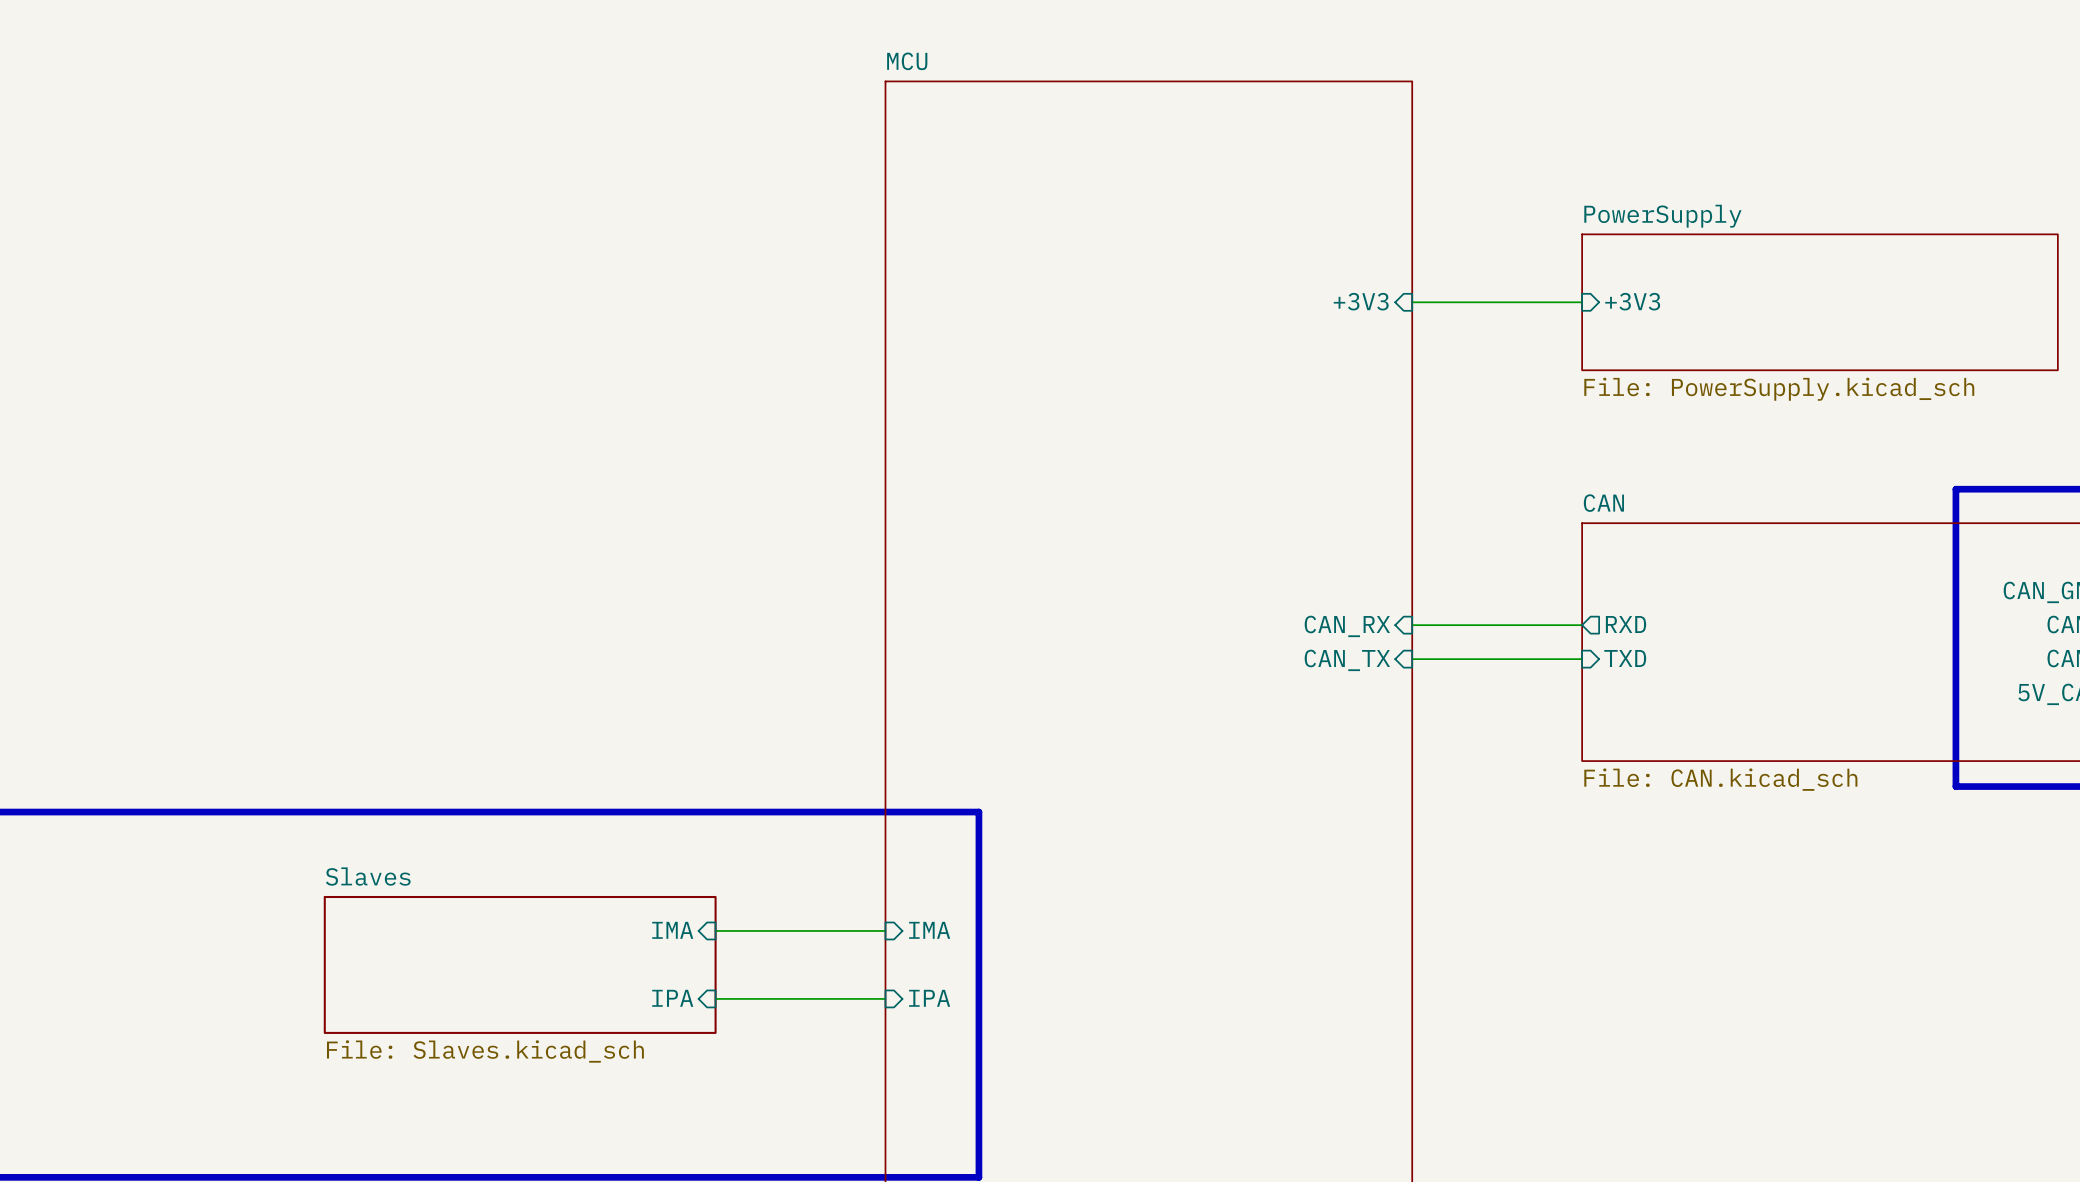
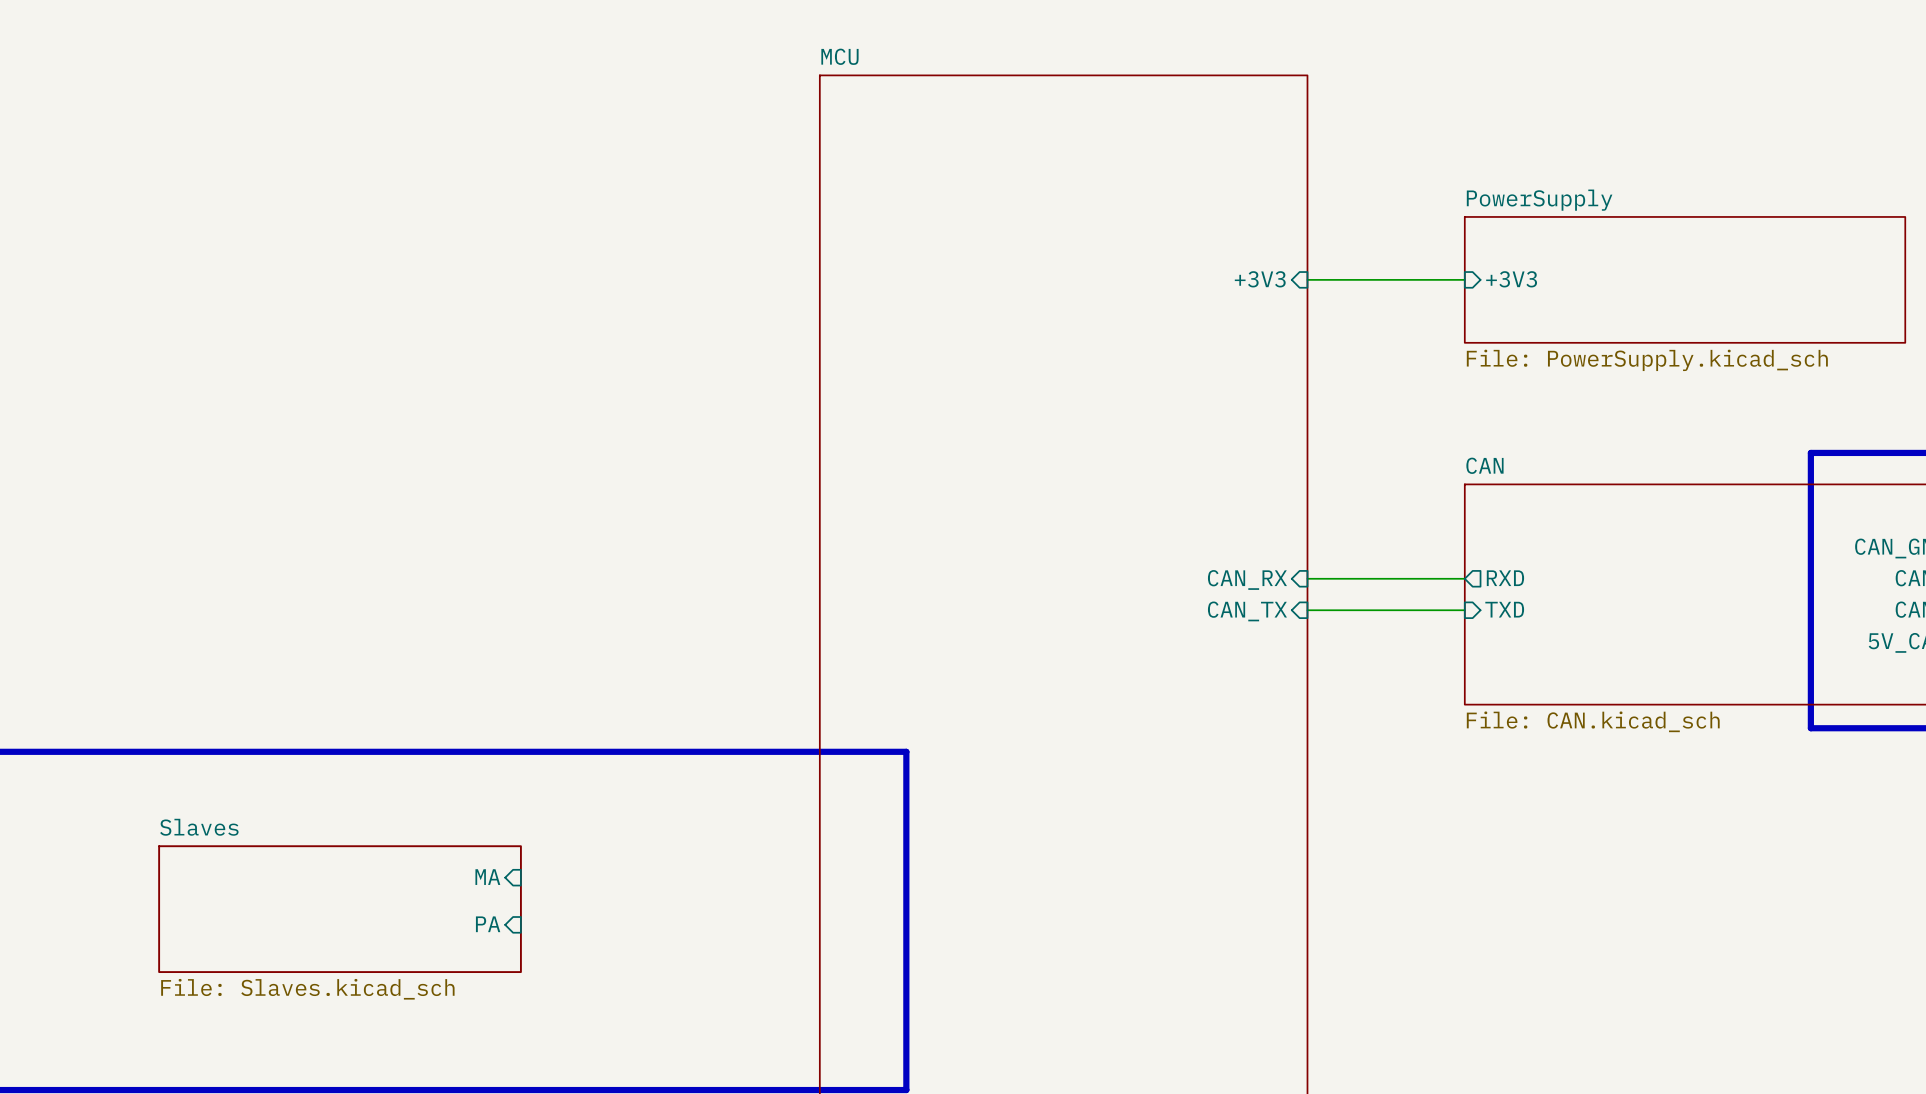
sheet pin: IMA (672, 930) -> none
wire: (715, 930) (885, 930) -> none
sheet pin: IMA (929, 930) -> none
sheet pin: none -> MA (487, 877)
sheet Slaves position: (520, 964) -> (340, 909)
sheet pin: none -> PA (488, 924)
sheet pin: IPA (672, 998) -> none
wire: (715, 998) (885, 998) -> none
sheet pin: IPA (929, 998) -> none

